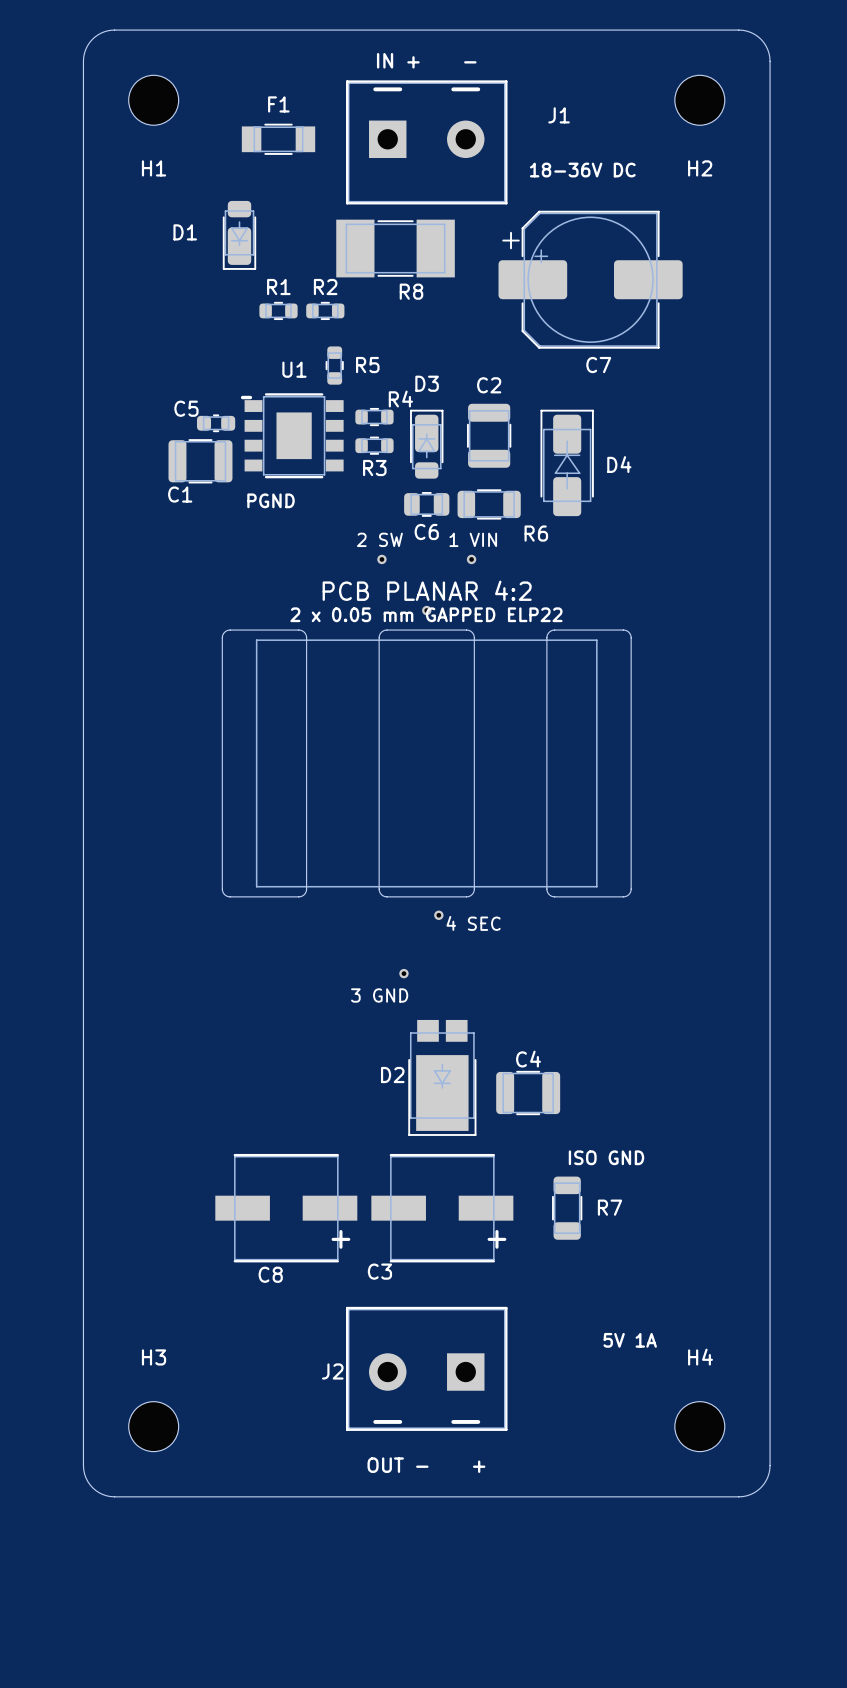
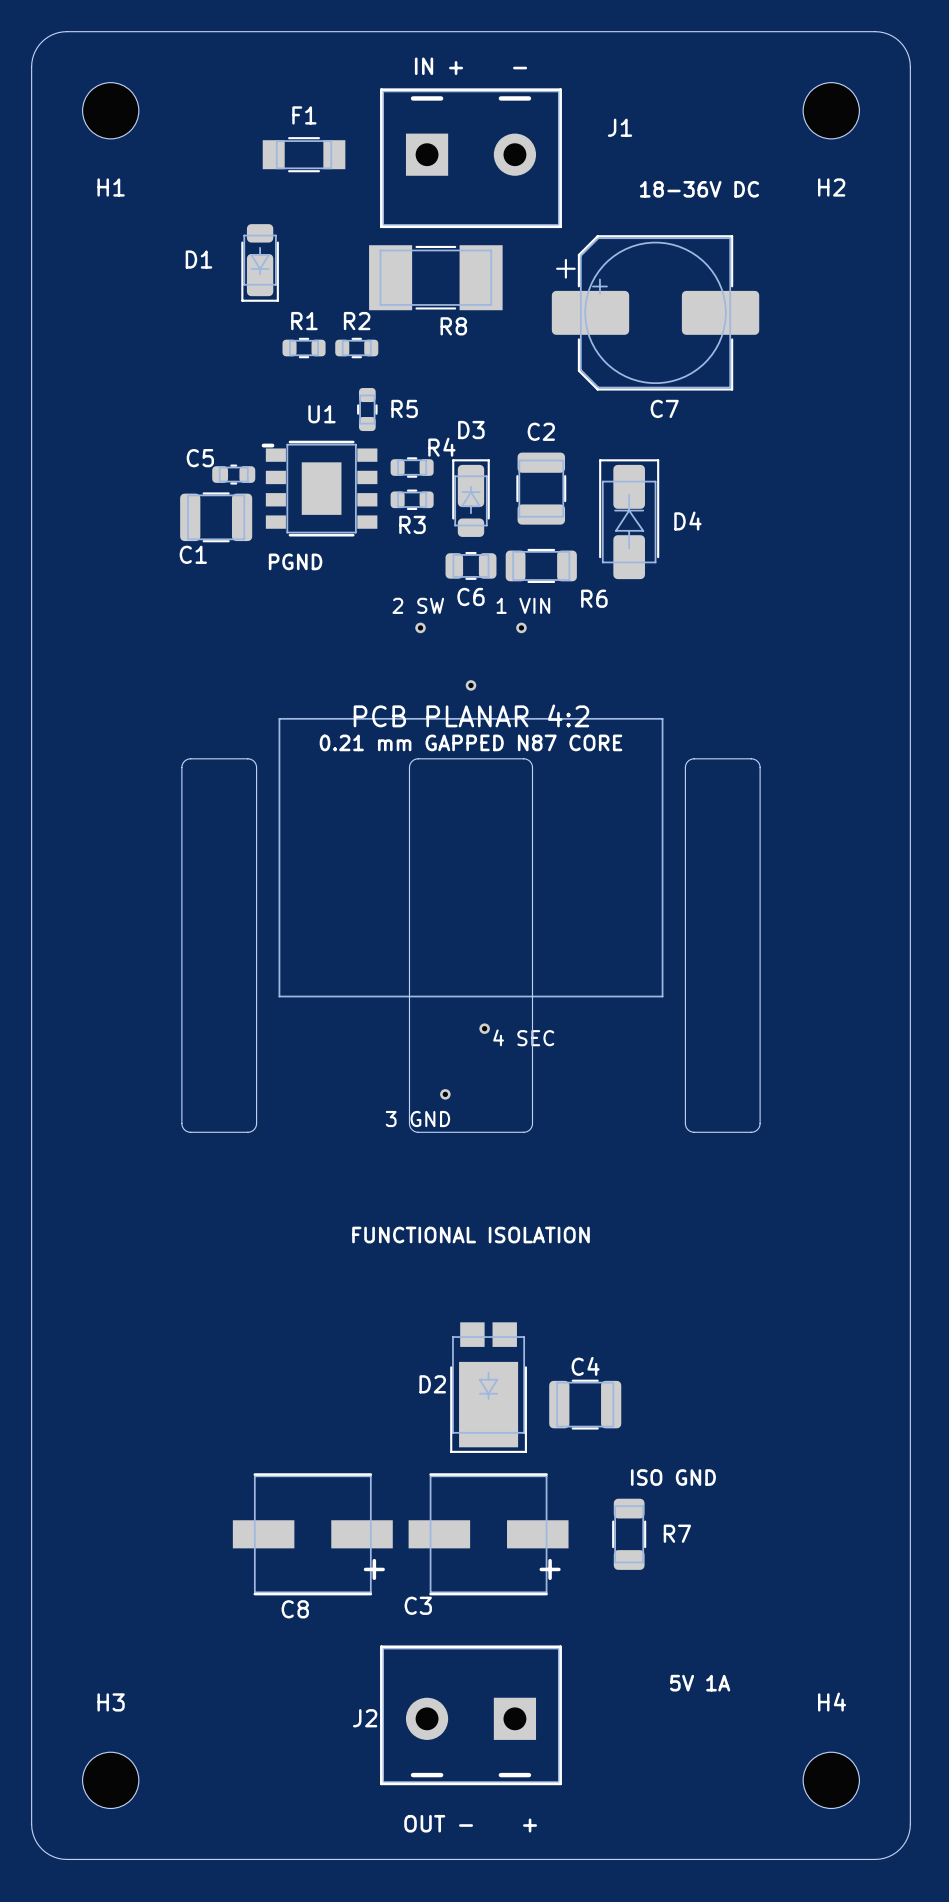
board edge: (114, 30) (104, 31) (92, 39) (85, 50) (83, 61) (83, 1465) (85, 1477) (92, 1487) (102, 1494) (114, 1496) (738, 1496) (754, 1492) (760, 1487) (767, 1477) (770, 1465) (770, 61) (767, 49) (760, 39) (750, 32) (738, 30) -> (119, 31) (66, 31) (55, 33) (44, 39) (37, 48) (31, 66) (31, 1824) (34, 1837) (41, 1849) (53, 1856) (66, 1859) (875, 1859) (892, 1854) (900, 1849) (907, 1837) (910, 1824) (910, 66) (907, 53) (903, 45) (888, 34) (875, 31) (822, 31)
H1 position: (153, 100) -> (110, 110)
H2 position: (699, 100) -> (831, 110)
text position: 18-36V DC (582, 170) -> 18-36V DC (699, 189)
text position: PCB PLANAR 4:2 (427, 590) -> PCB PLANAR 4:2 (471, 715)
text: 2 x 0.05 mm GAPPED ELP22 (426, 614) -> none
board edge: (230, 630) (299, 630) (306, 636) (306, 889) (304, 893) (300, 896) (229, 896) (222, 890) (222, 637) (224, 632) (230, 630) -> none
board edge: (386, 630) (467, 630) (473, 635) (474, 889) (472, 893) (468, 896) (386, 896) (379, 891) (379, 637) (381, 632) (386, 630) -> (418, 758) (412, 761) (409, 767) (409, 1126) (412, 1130) (418, 1132) (525, 1131) (530, 1128) (532, 1123) (532, 764) (529, 760) (523, 758) (418, 758)
board edge: (554, 630) (624, 630) (630, 636) (631, 889) (629, 893) (625, 896) (553, 896) (547, 890) (546, 637) (549, 632) (554, 630) -> none
text: none -> 0.21 mm GAPPED N87 CORE (470, 742)
board edge: none -> (190, 758) (248, 758) (254, 761) (256, 766) (256, 1123) (254, 1129) (248, 1132) (189, 1132) (184, 1129) (181, 1124) (181, 767) (184, 761) (190, 758)
board edge: none -> (694, 758) (752, 758) (757, 761) (760, 766) (760, 1123) (757, 1129) (752, 1132) (693, 1132) (687, 1129) (685, 1124) (685, 767) (687, 761) (694, 758)
D2 position: (442, 1077) -> (488, 1387)
C4 position: (528, 1093) -> (585, 1404)
text: none -> FUNCTIONAL ISOLATION (470, 1235)
text position: ISO GND (606, 1157) -> ISO GND (673, 1477)
C8 position: (286, 1208) -> (312, 1534)
C3 position: (442, 1208) -> (488, 1534)
R7 position: (567, 1208) -> (629, 1534)
text position: 5V 1A (630, 1340) -> 5V 1A (700, 1683)
J2 position: (426, 1368) -> (470, 1715)
H3 position: (153, 1426) -> (110, 1780)
H4 position: (699, 1426) -> (831, 1780)
text position: OUT - + (426, 1465) -> OUT - + (470, 1823)

